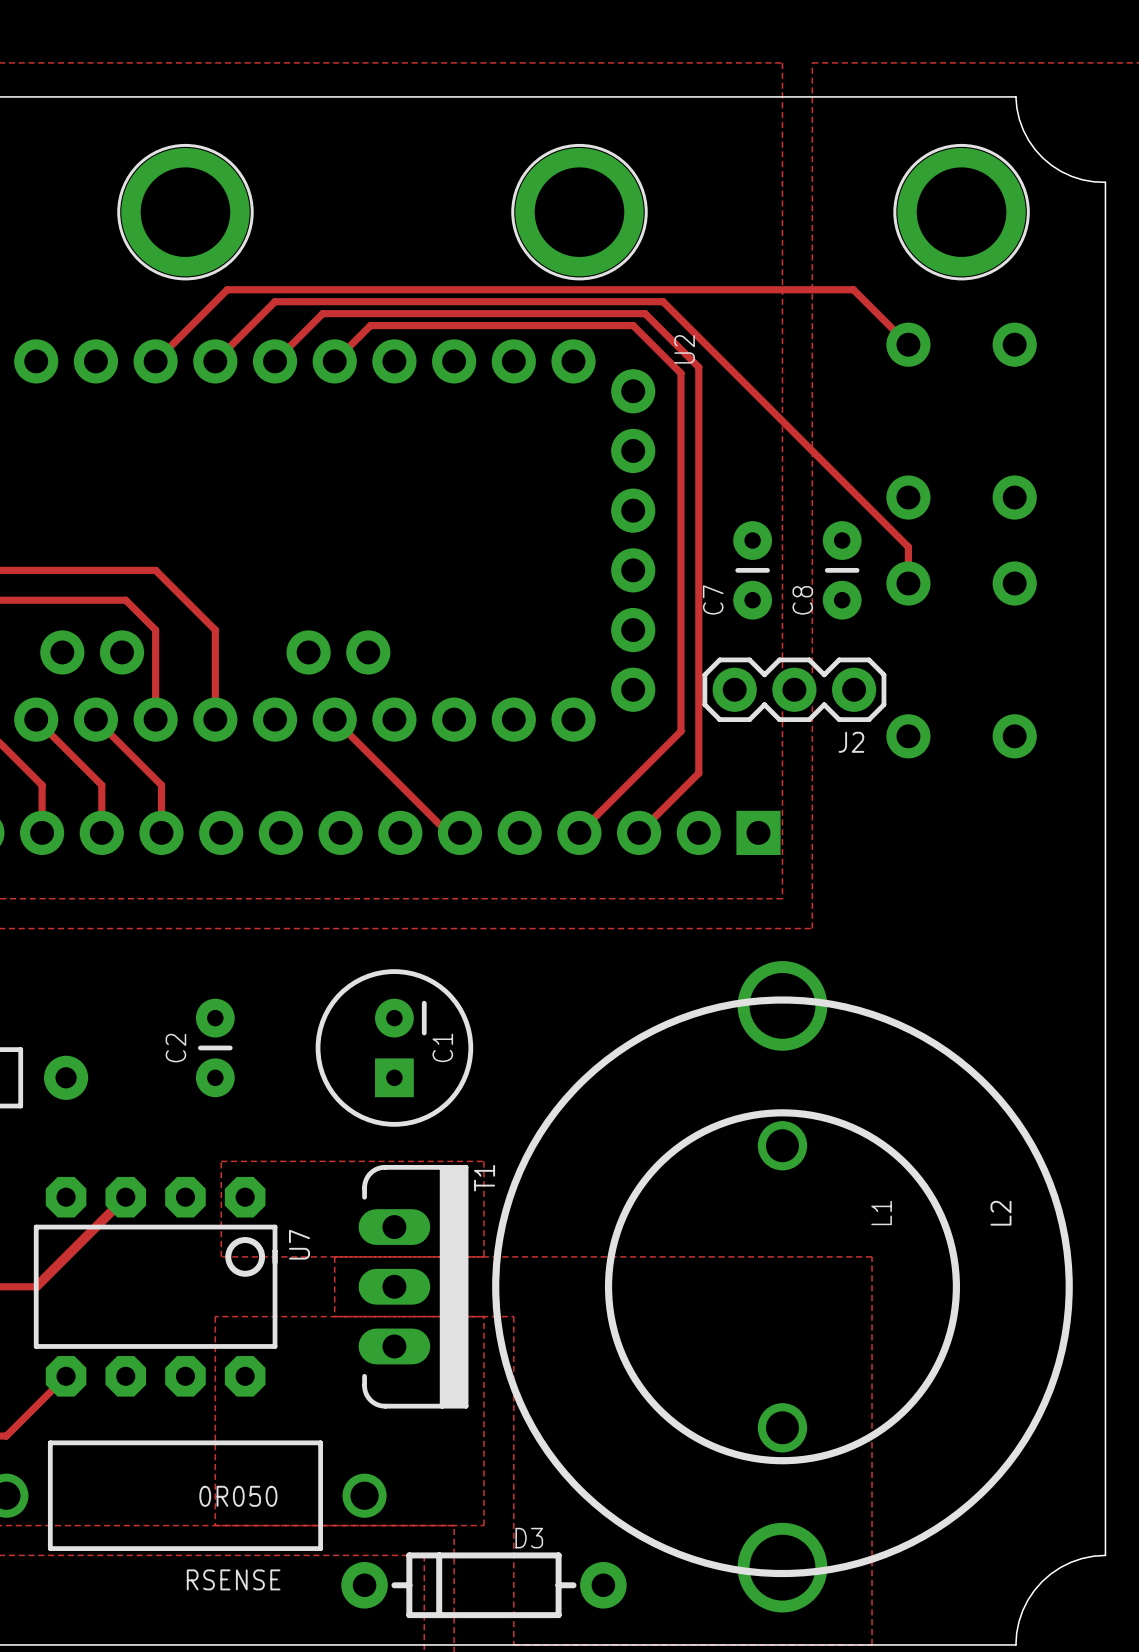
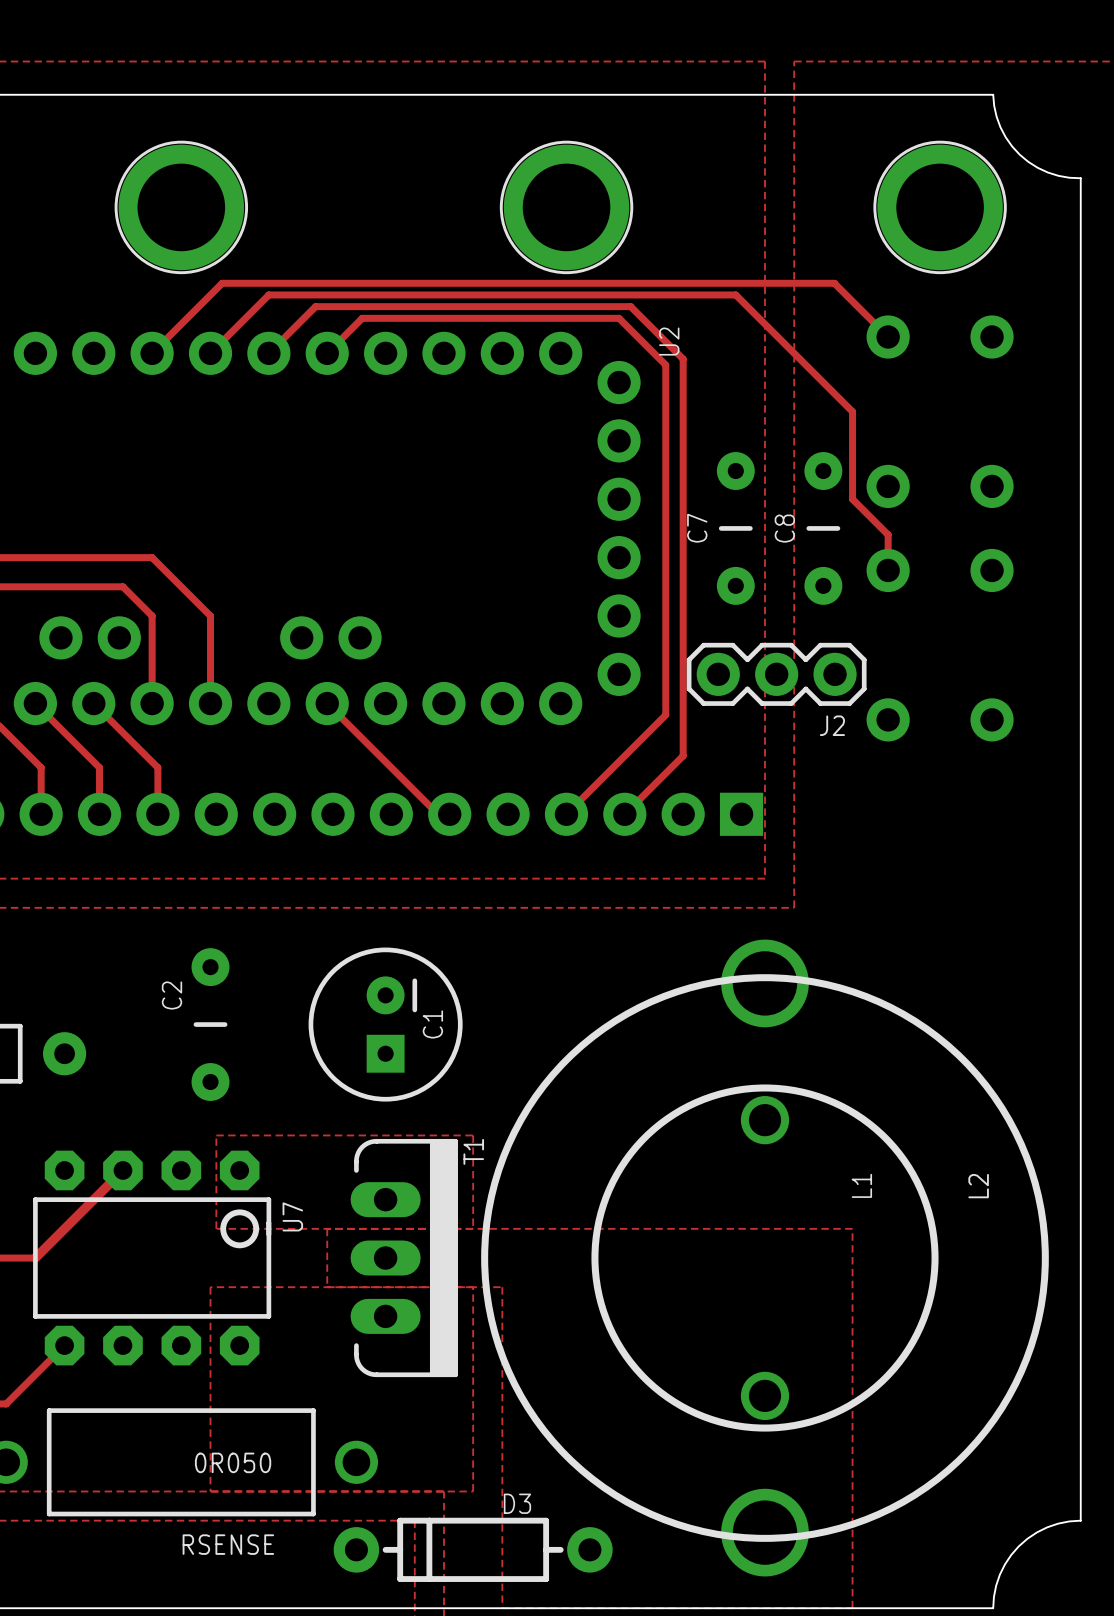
track: (663, 301) (872, 510) -> (648, 294) (735, 294) (852, 411) (852, 499)
C7 footprint: [733, 521, 773, 620] -> [716, 452, 755, 605]
C8 footprint: [822, 521, 862, 620] -> [804, 452, 843, 605]
C2 footprint: [195, 998, 235, 1098] -> [191, 948, 230, 1101]

